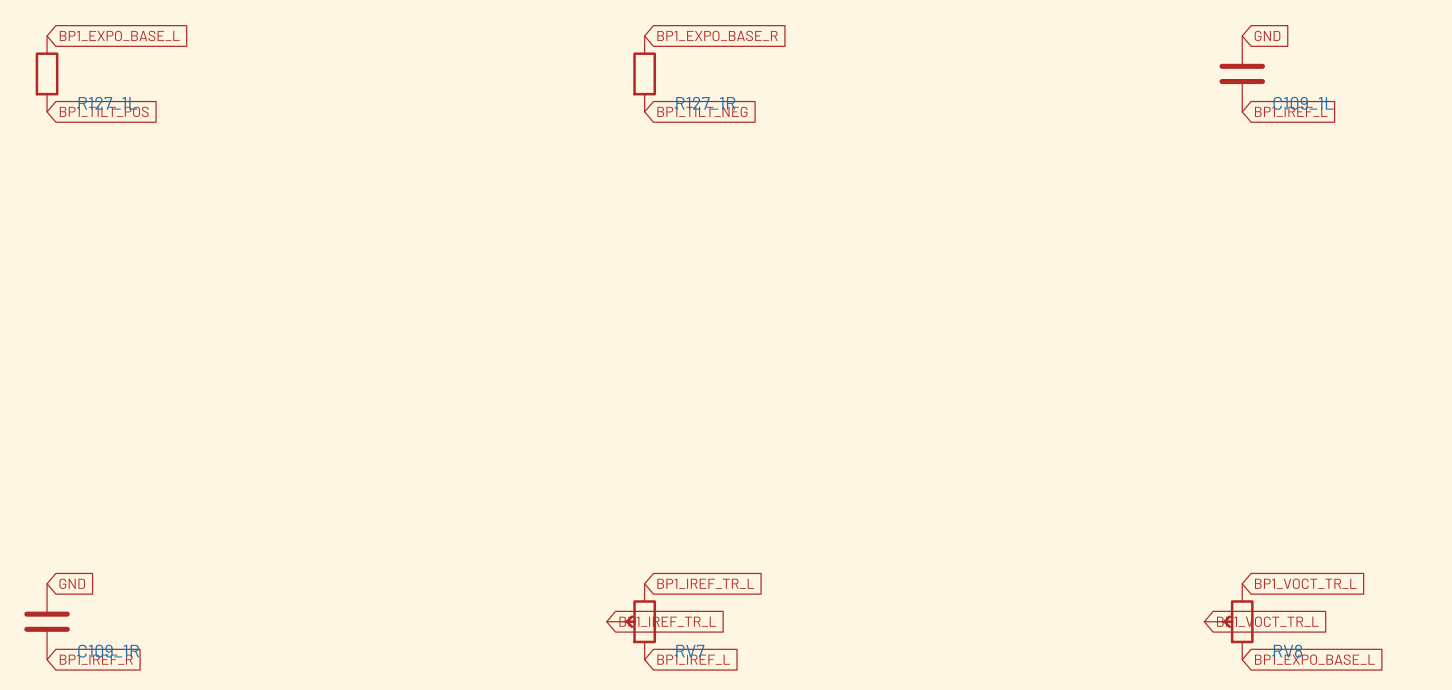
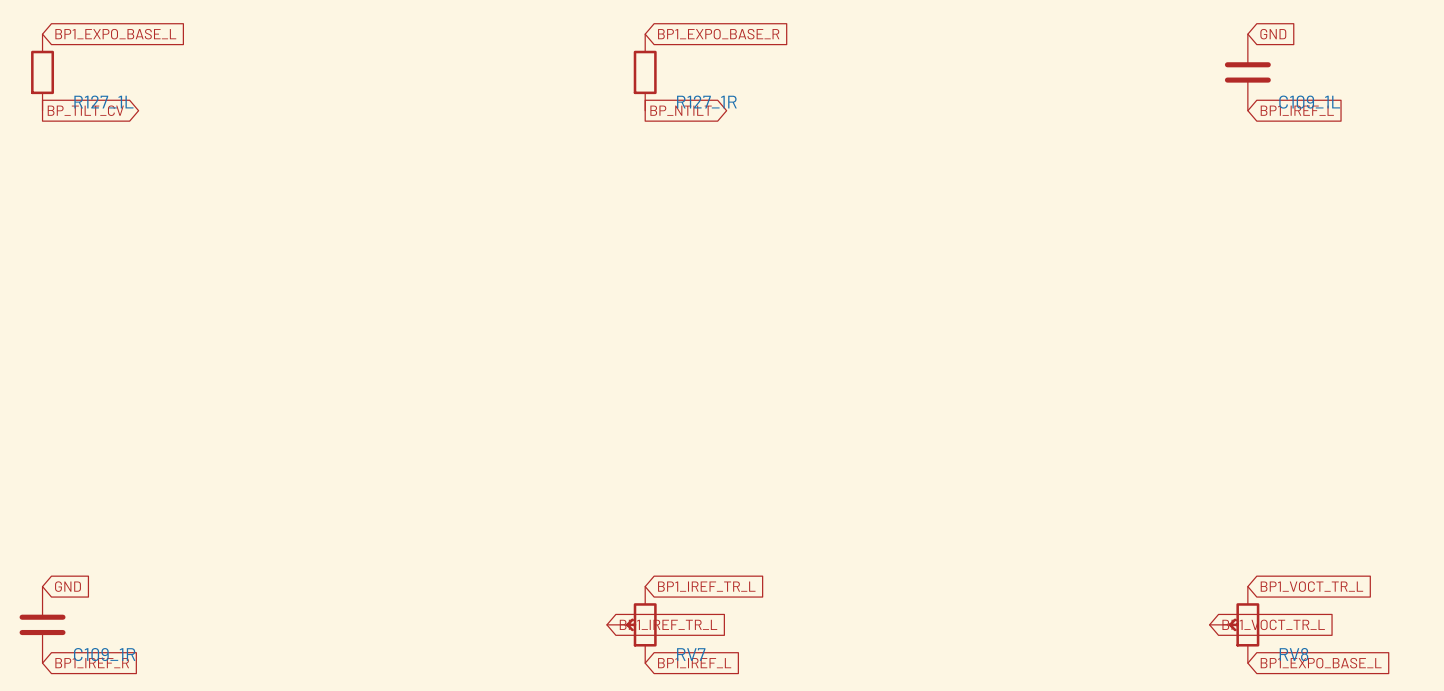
global label shape: input (104, 111) -> output (85, 110)
global label: BP1_TILT_POS (104, 111) -> BP_TILT_CV (85, 110)
global label shape: input (702, 111) -> output (681, 110)
global label: BP1_TILT_NEG (702, 111) -> BP_NTILT (681, 110)

